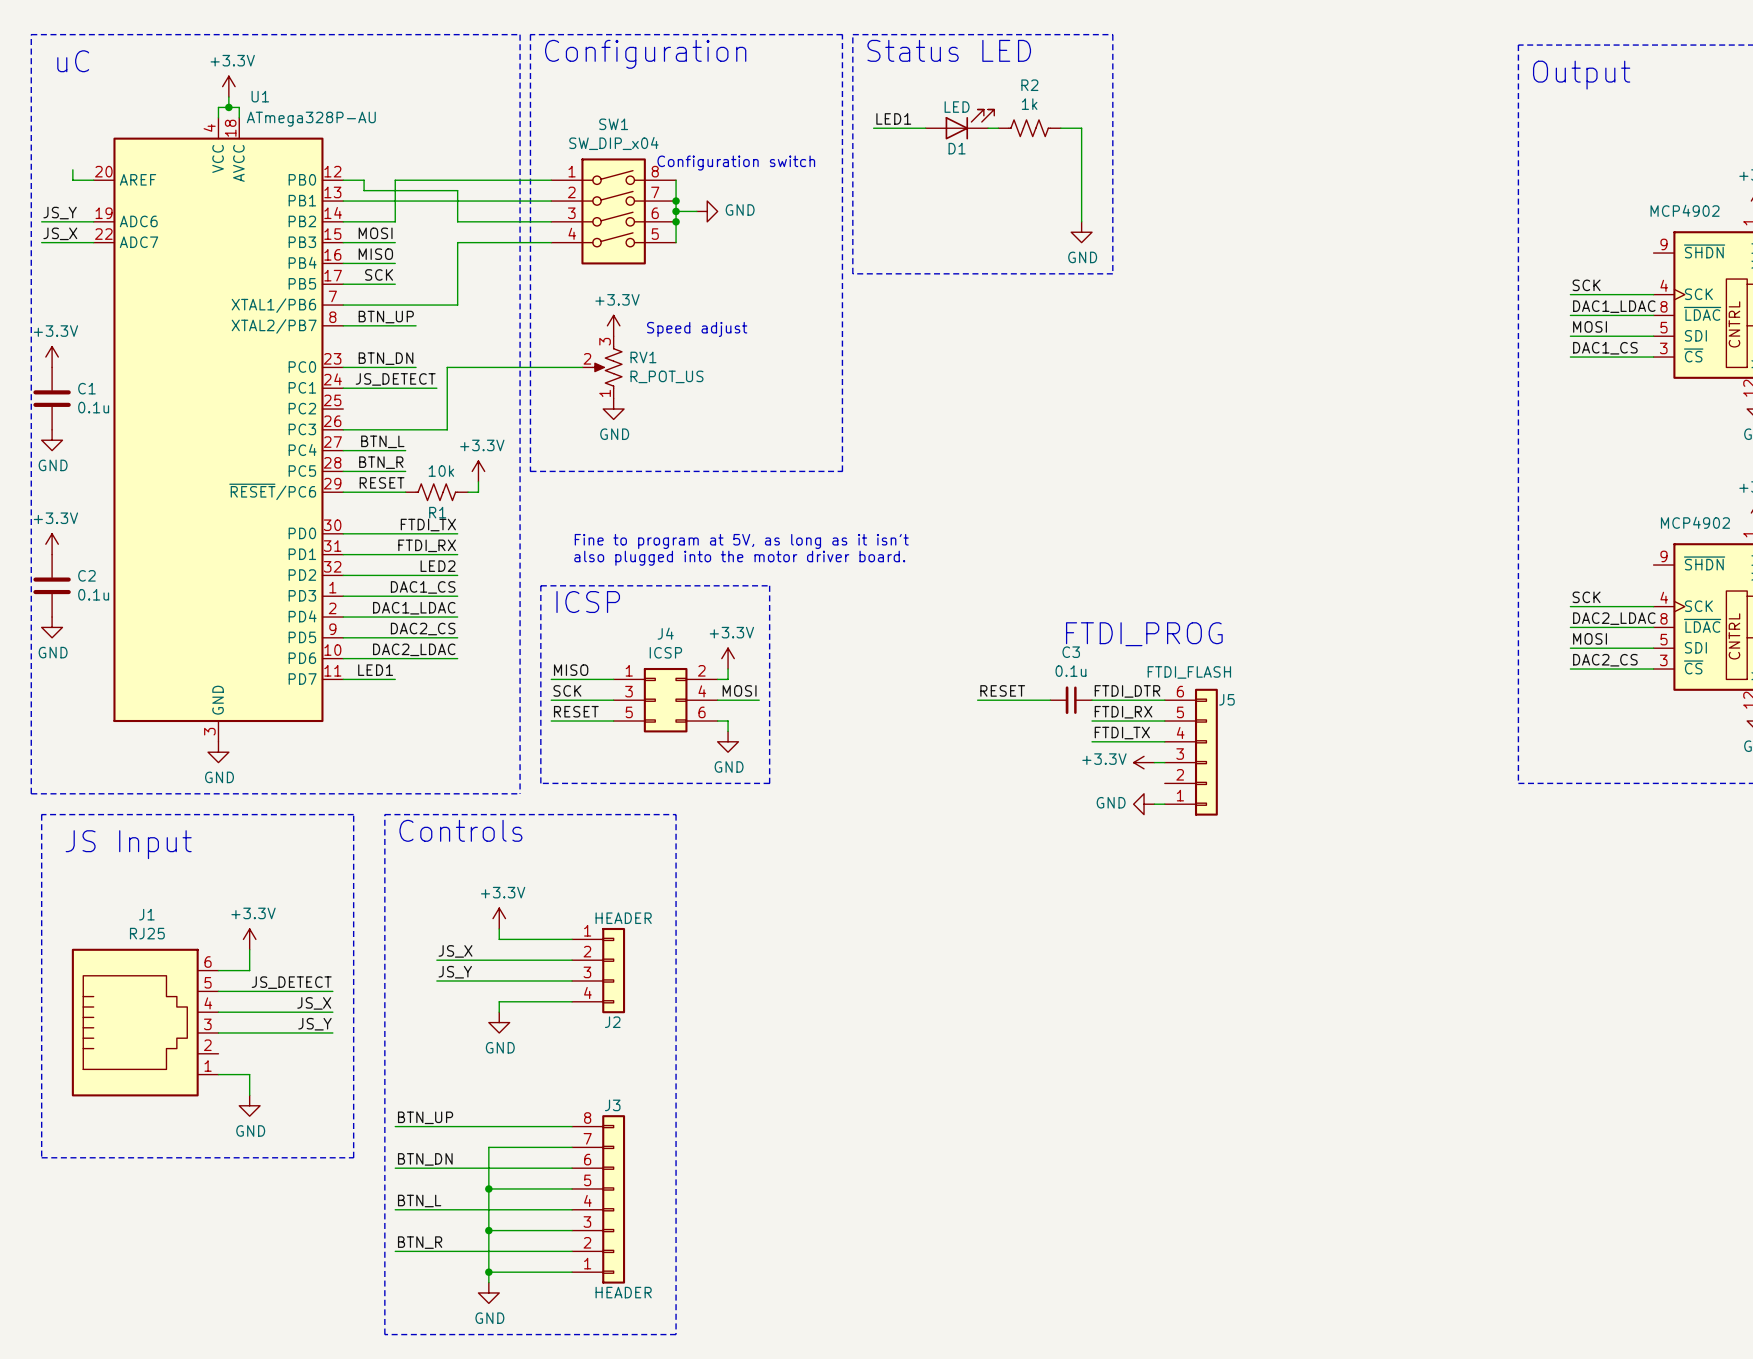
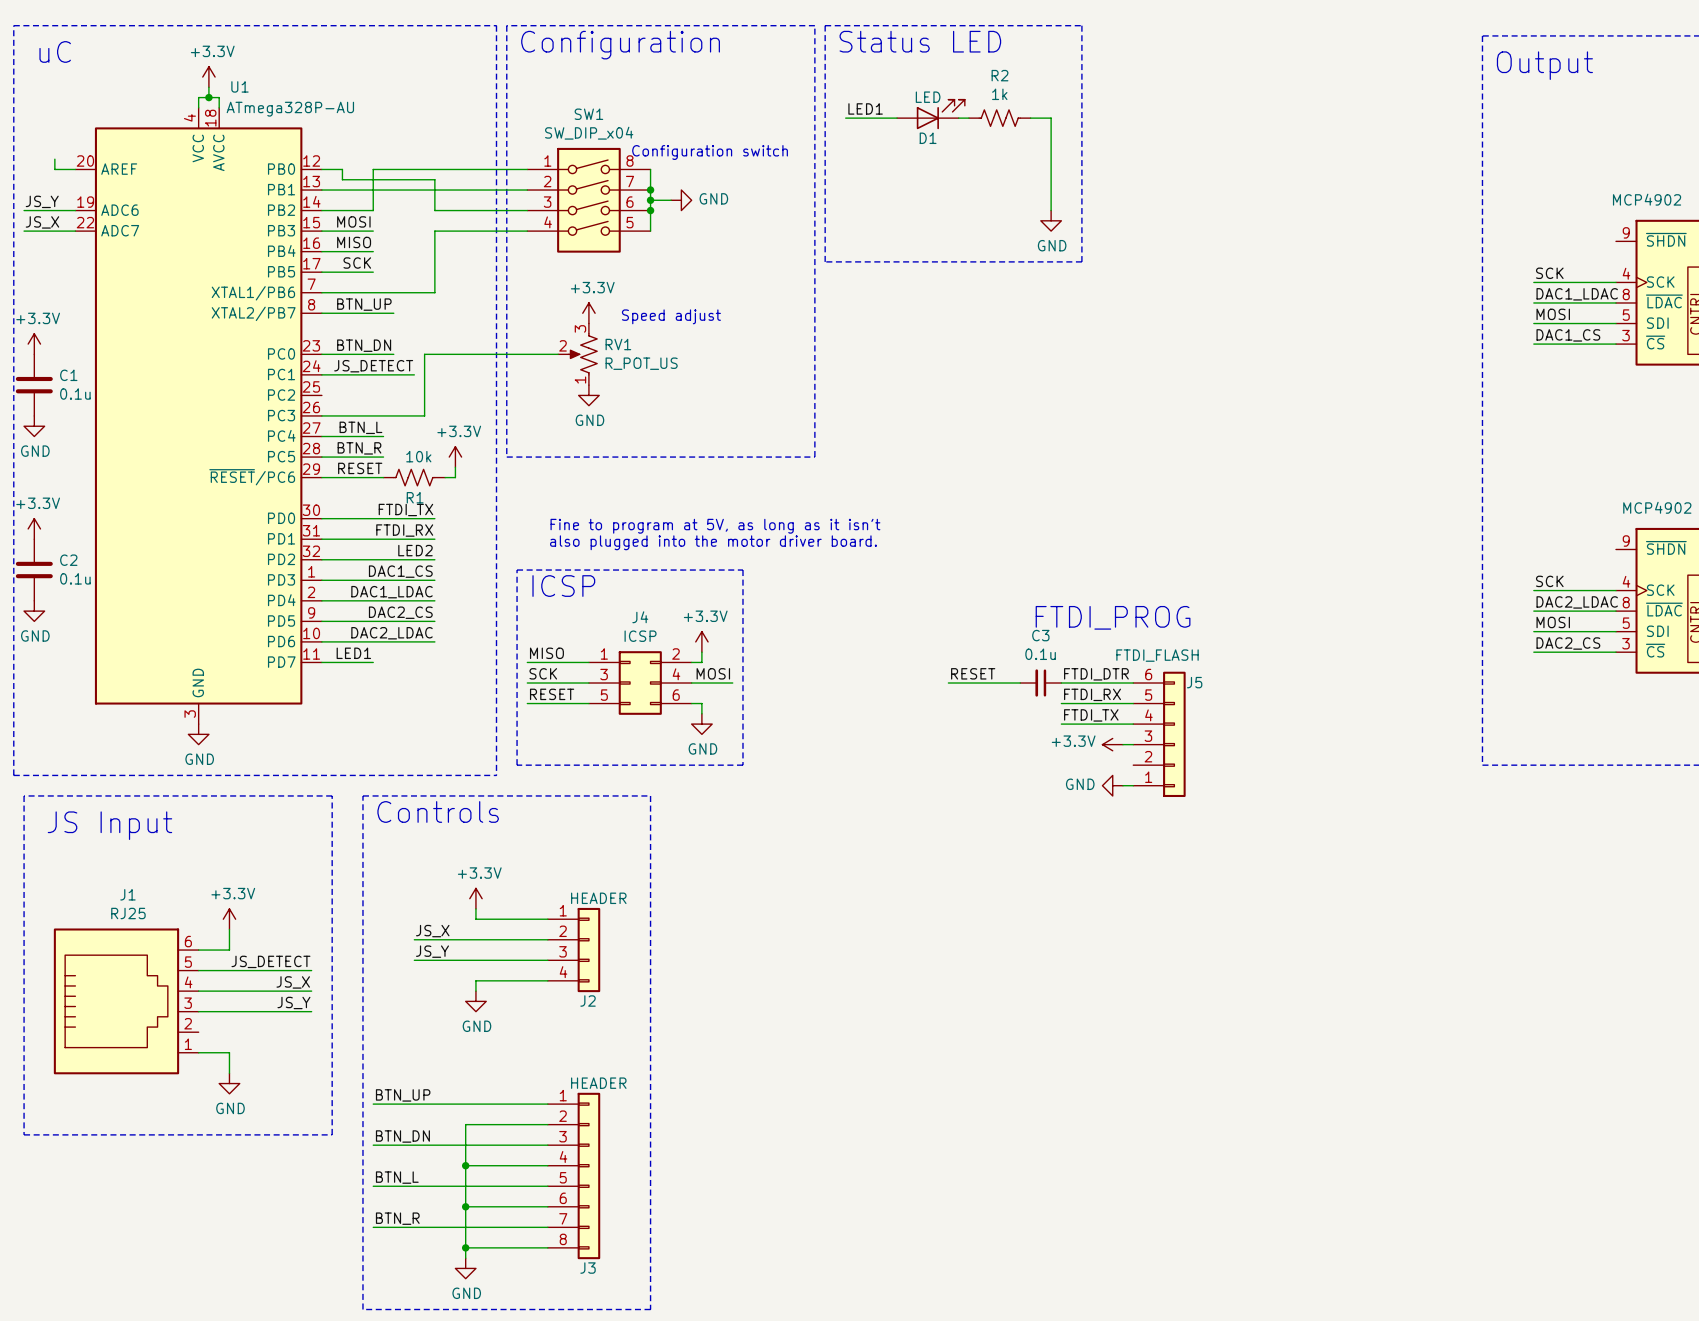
J3 flip: as is (613, 1199) -> up-down (588, 1175)

